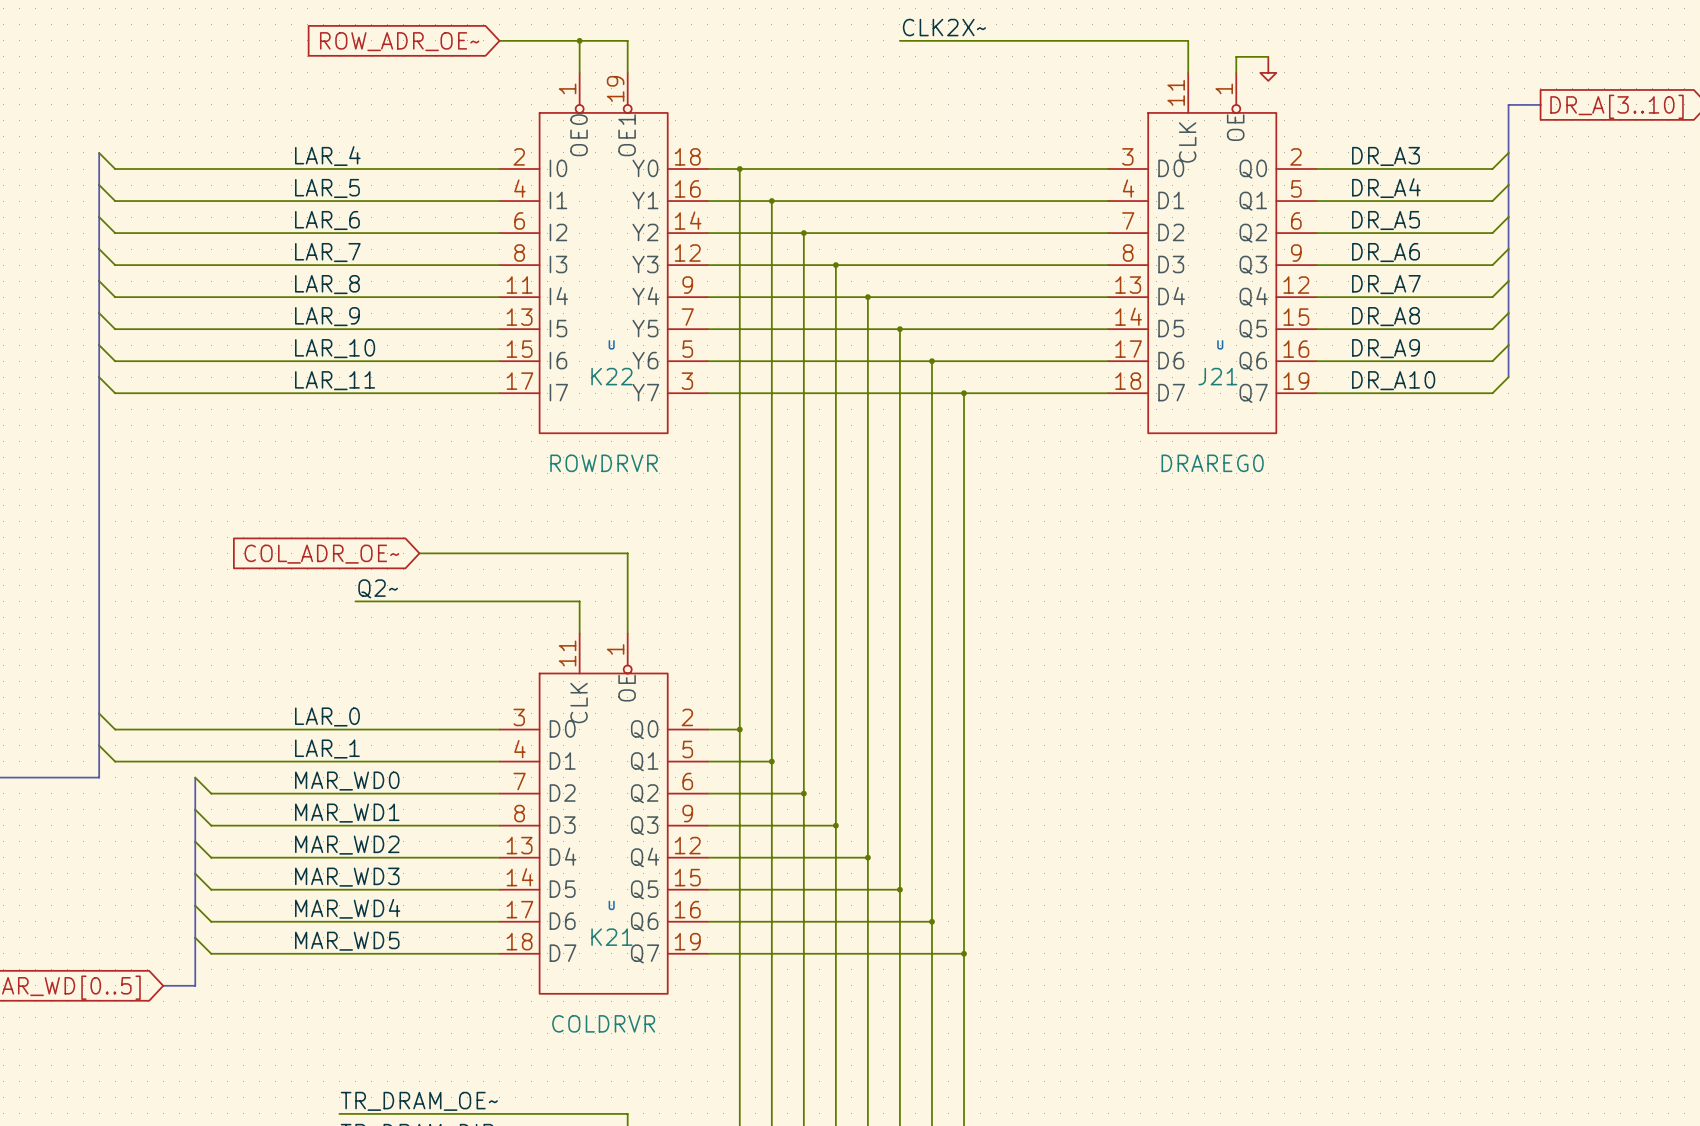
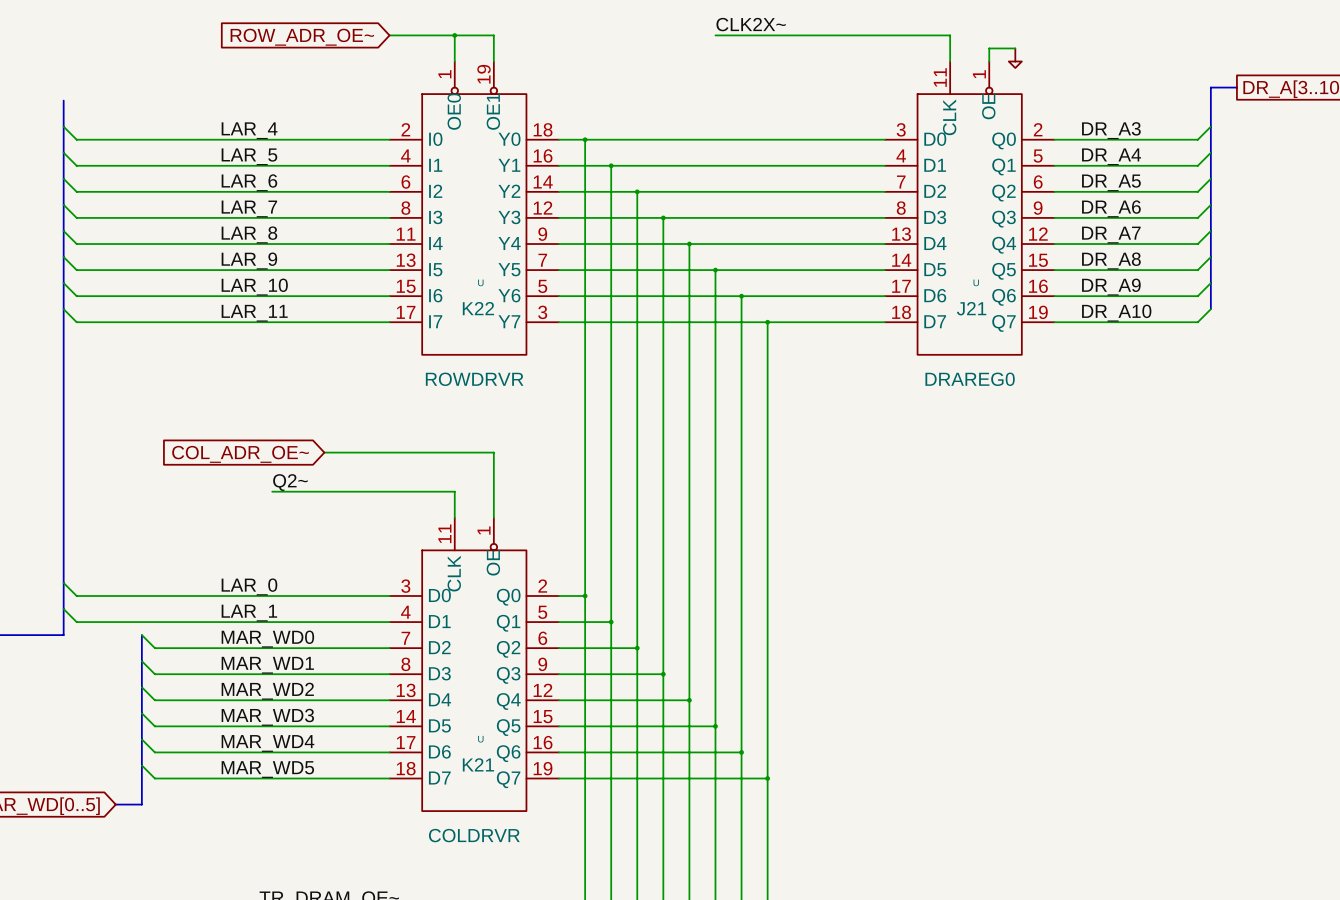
bus: none -> (63, 100) (63, 126)

